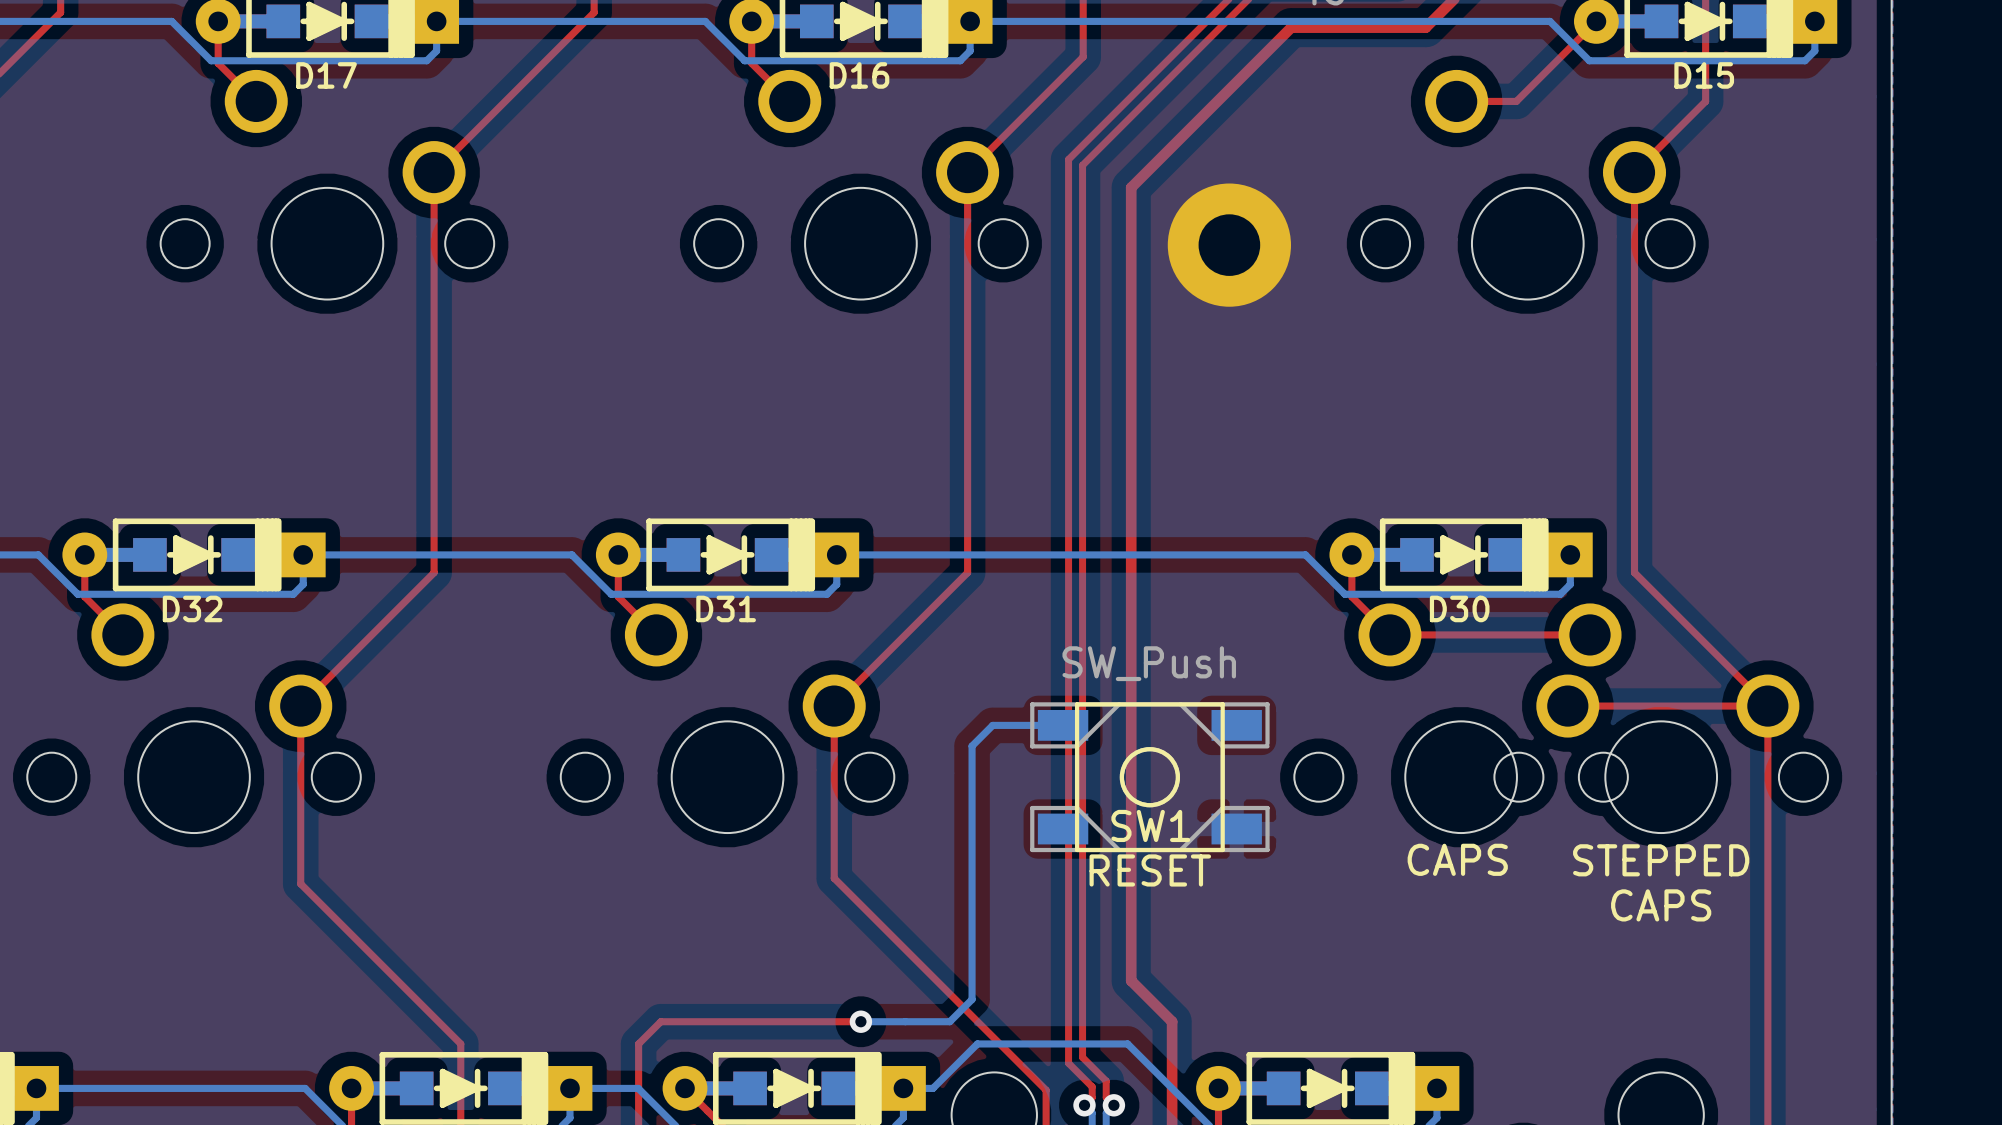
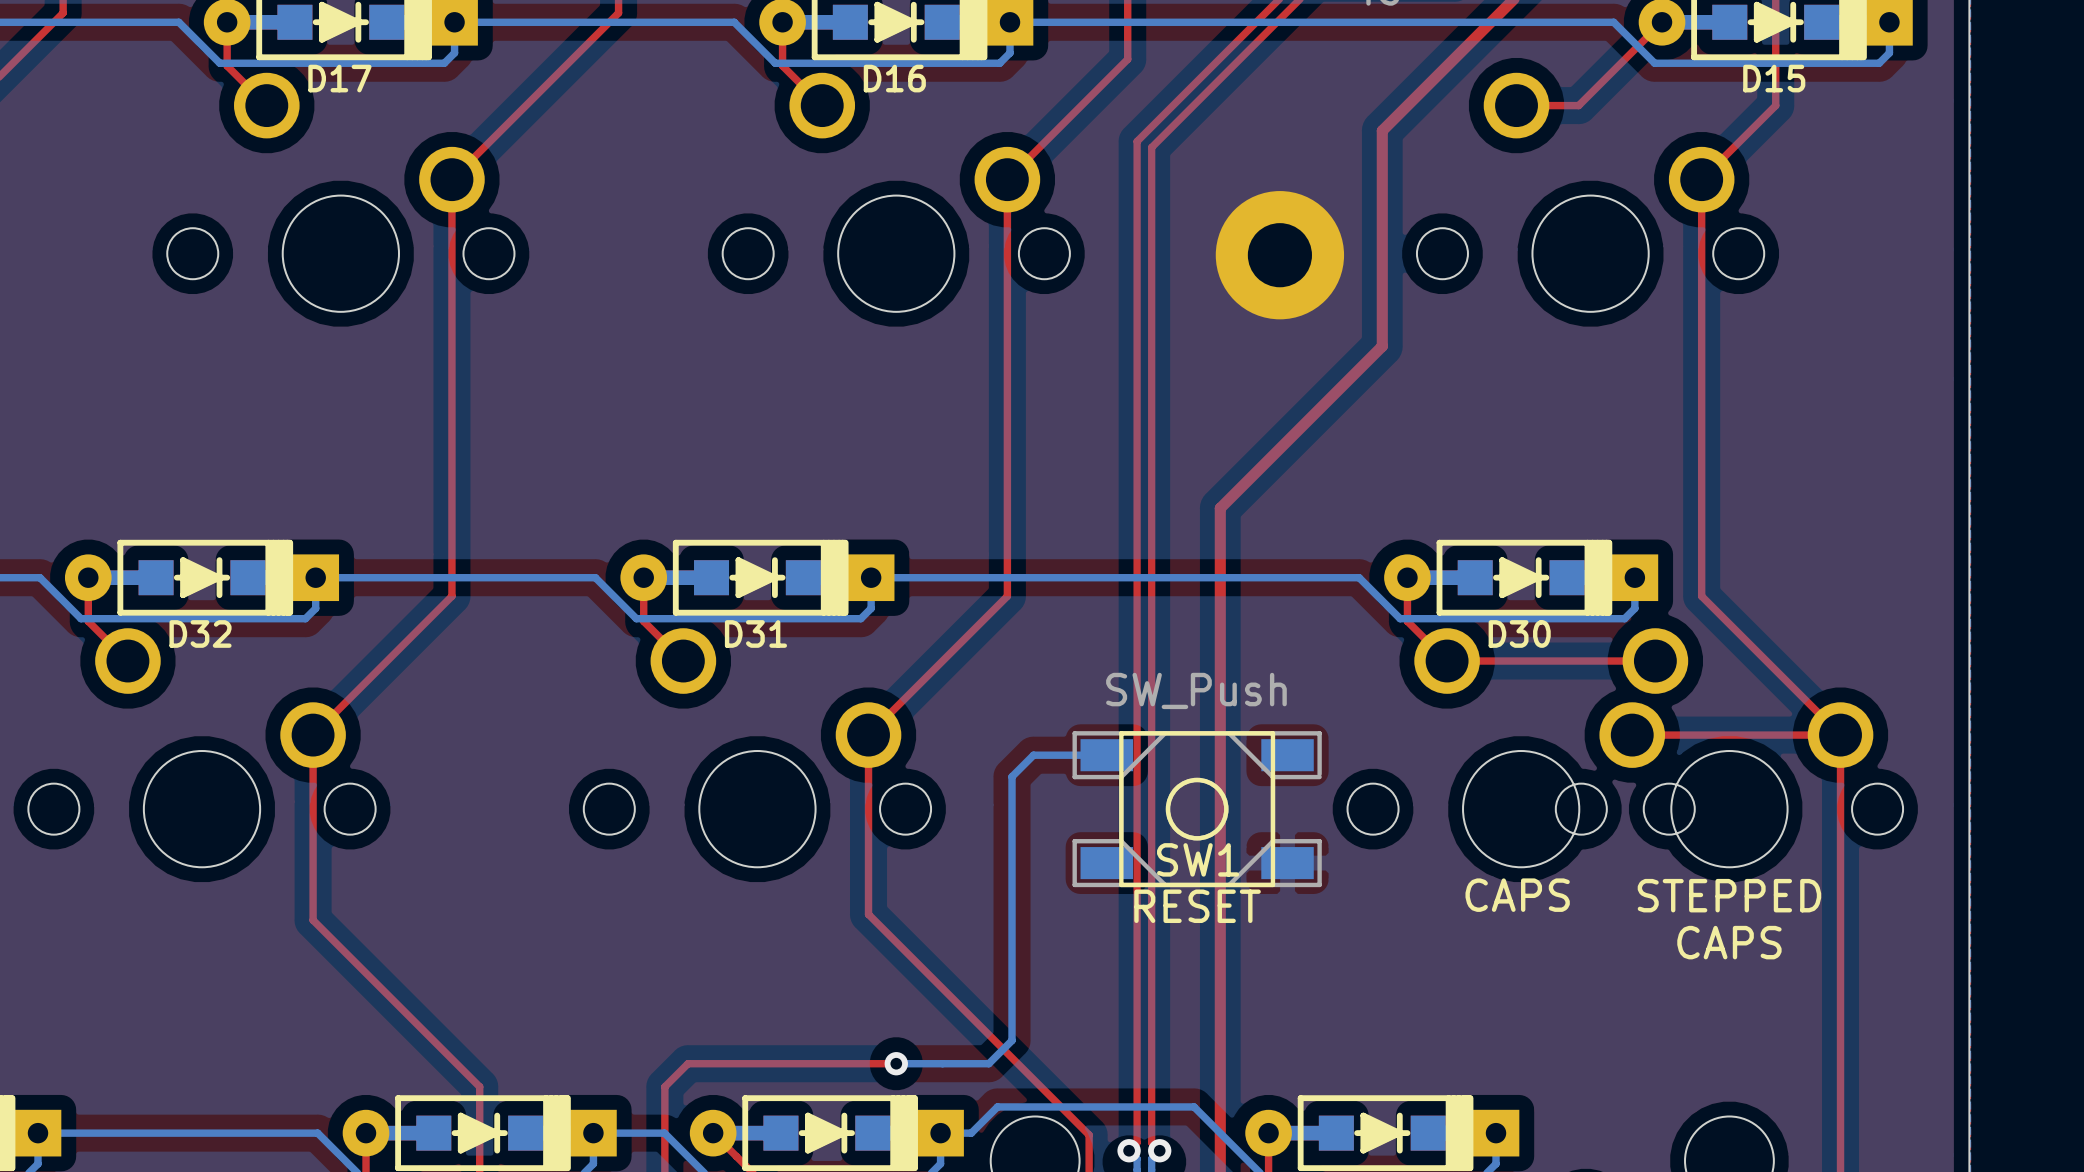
top track: (1425, 27) (1291, 27) (1131, 187) (1131, 980) (1172, 1021) -> (1484, 28) (1382, 130) (1382, 346) (1220, 508) (1220, 1063)
top track: (1092, 135) (1068, 159) (1068, 1063) (1092, 1086) -> (1137, 141) (1137, 1131)
top track: (1106, 141) (1082, 165) (1082, 1057) (1106, 1081) -> (1151, 147) (1151, 1125)
bottom track: (1146, 1063) (1127, 1043) (977, 1043) (958, 1063) -> (1194, 1106) (997, 1106)

